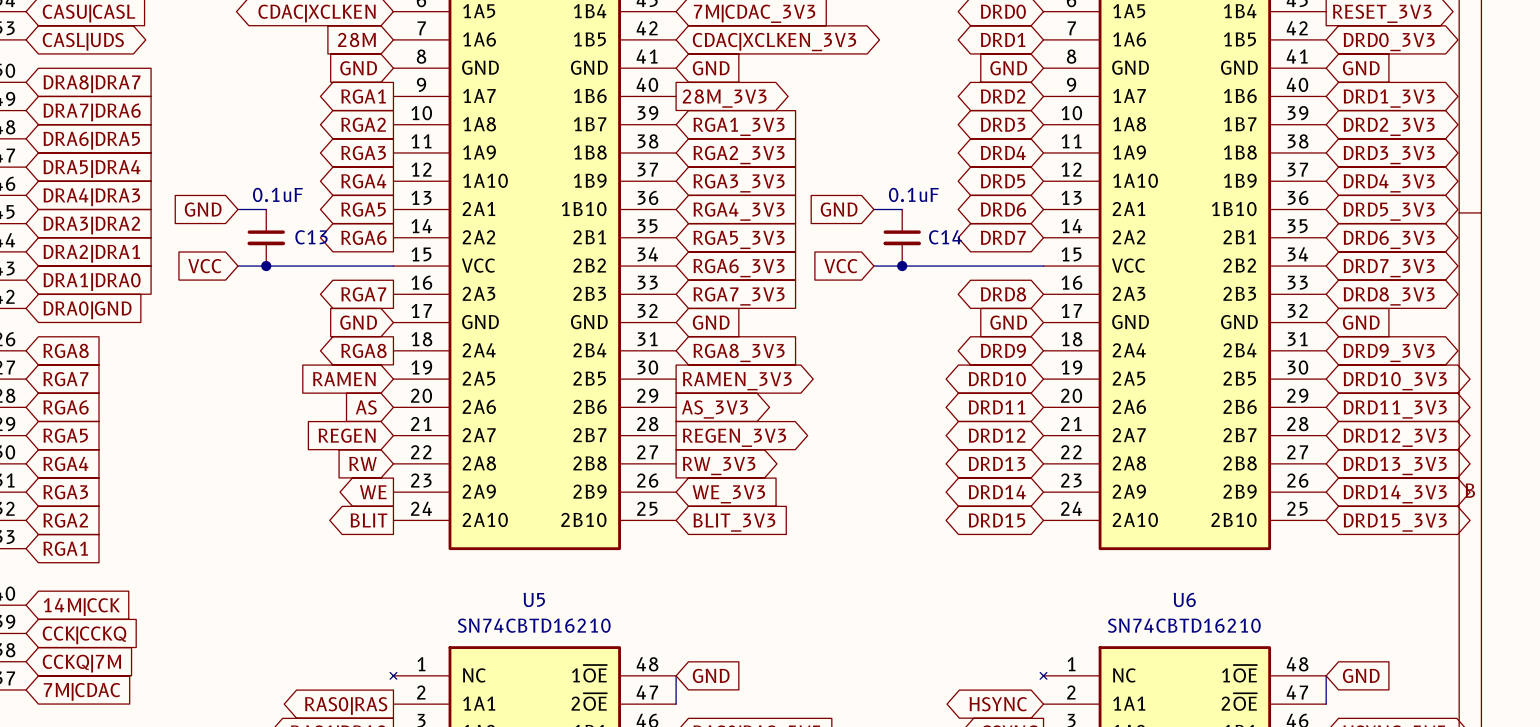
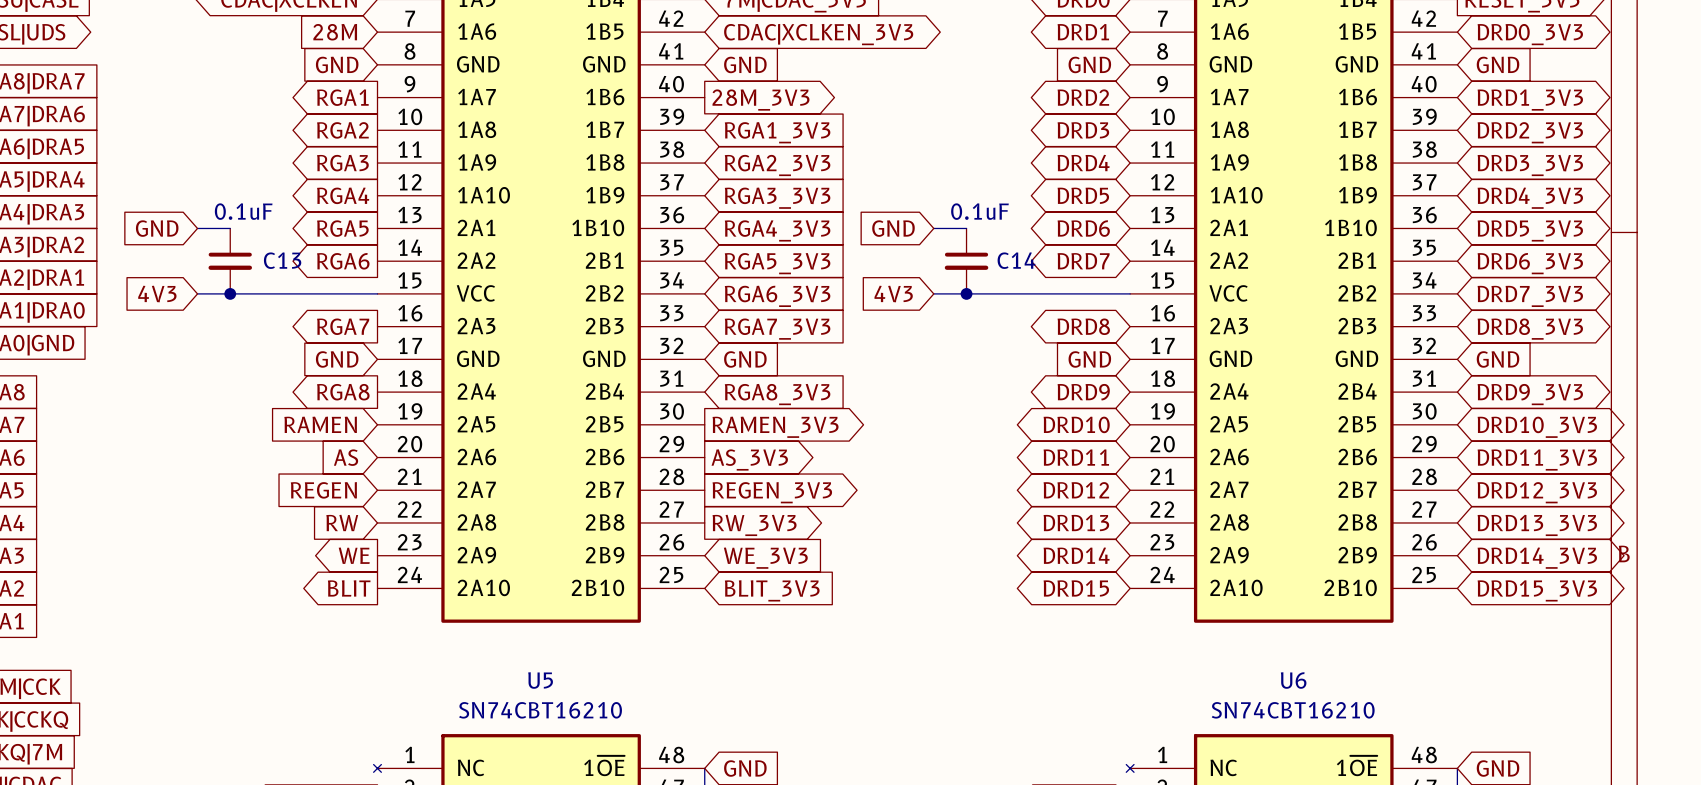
global label: VCC (204, 266) -> 4V3 (157, 294)
global label: VCC (840, 266) -> 4V3 (893, 294)
U5 value: SN74CBTD16210 (534, 625) -> SN74CBT16210 (540, 710)
U6 value: SN74CBTD16210 (1184, 625) -> SN74CBT16210 (1293, 710)

